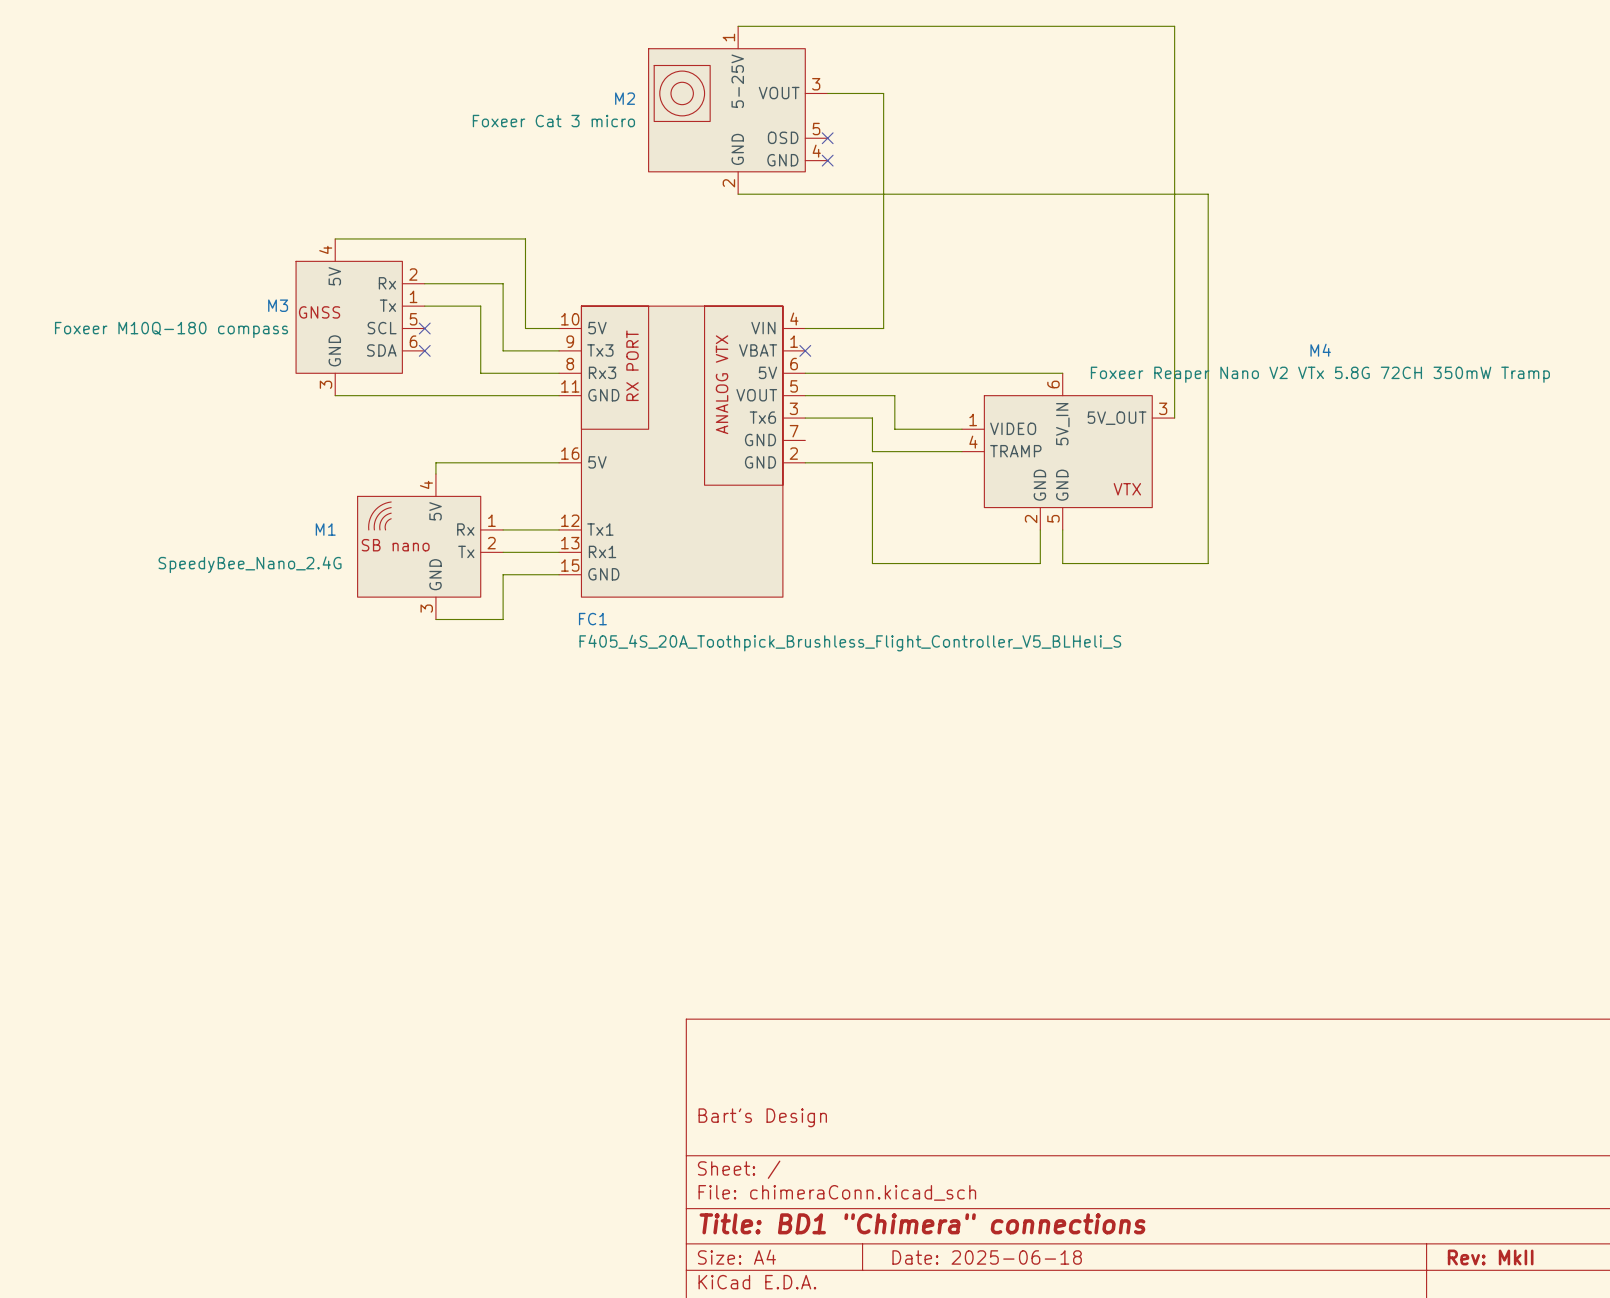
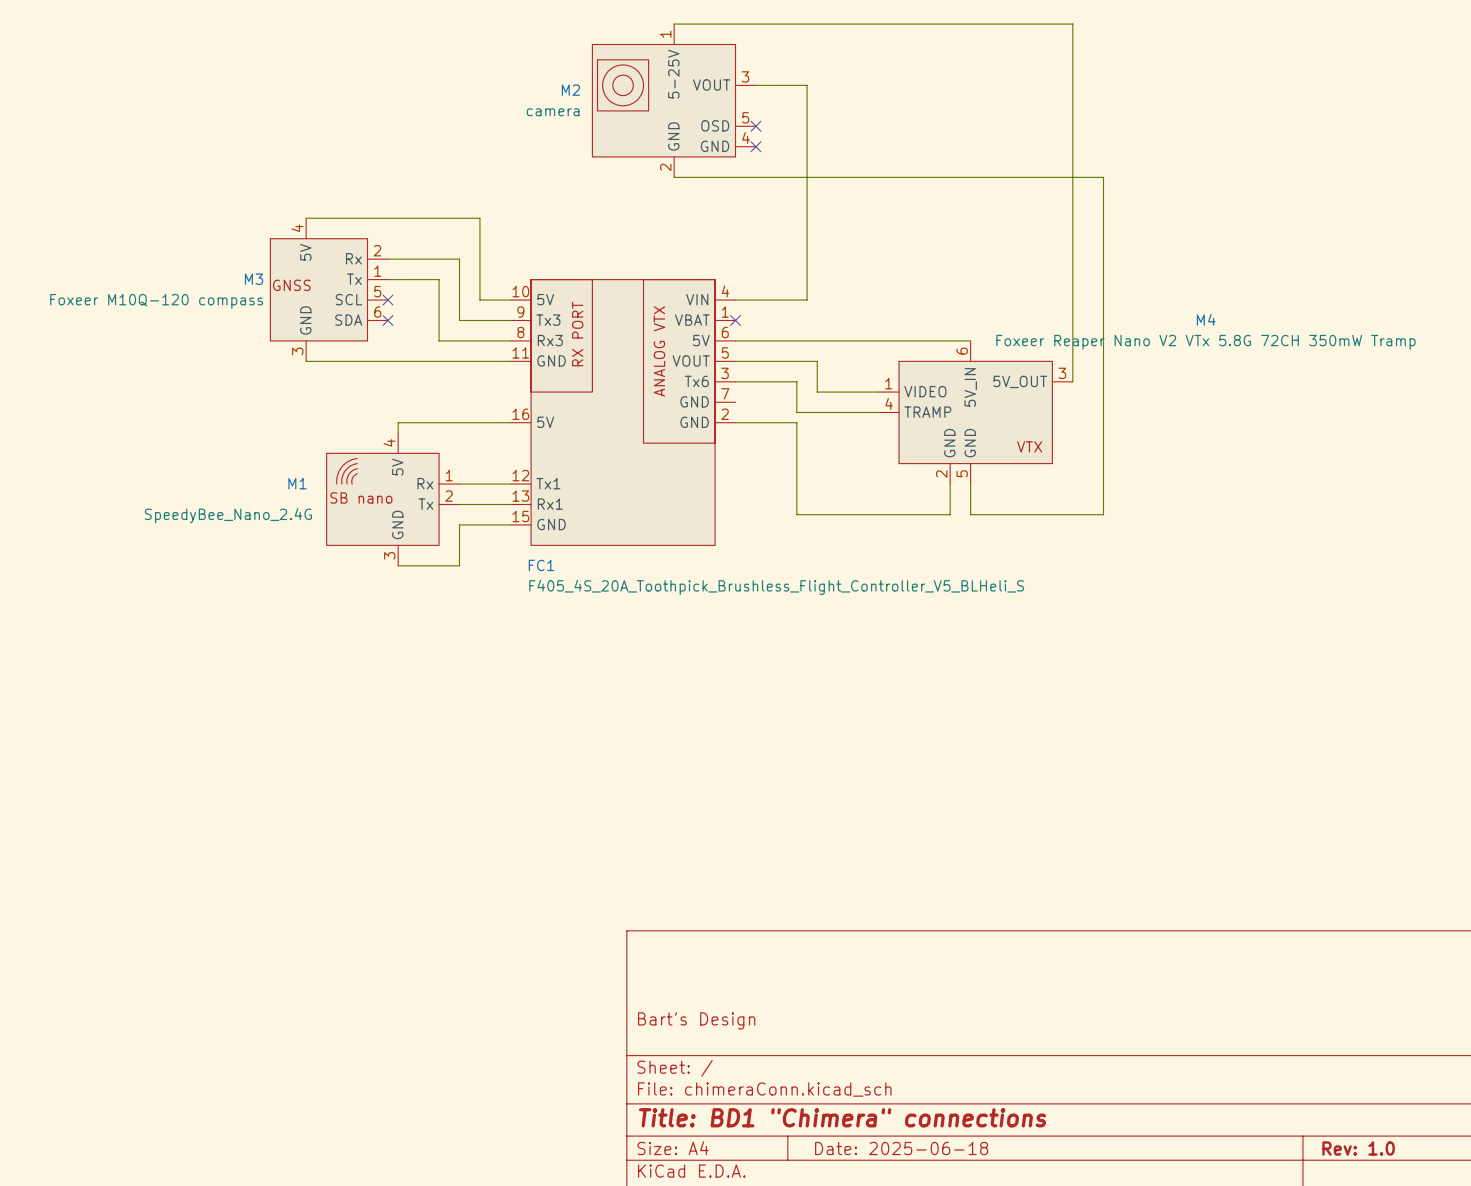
M2 value: Foxeer Cat 3 micro (553, 121) -> camera (553, 112)
M3 value: Foxeer M10Q-180 compass (171, 329) -> Foxeer M10Q-120 compass (156, 301)
title block: Rev: MkII (1490, 1257) -> Rev: 1.0 (1358, 1148)

